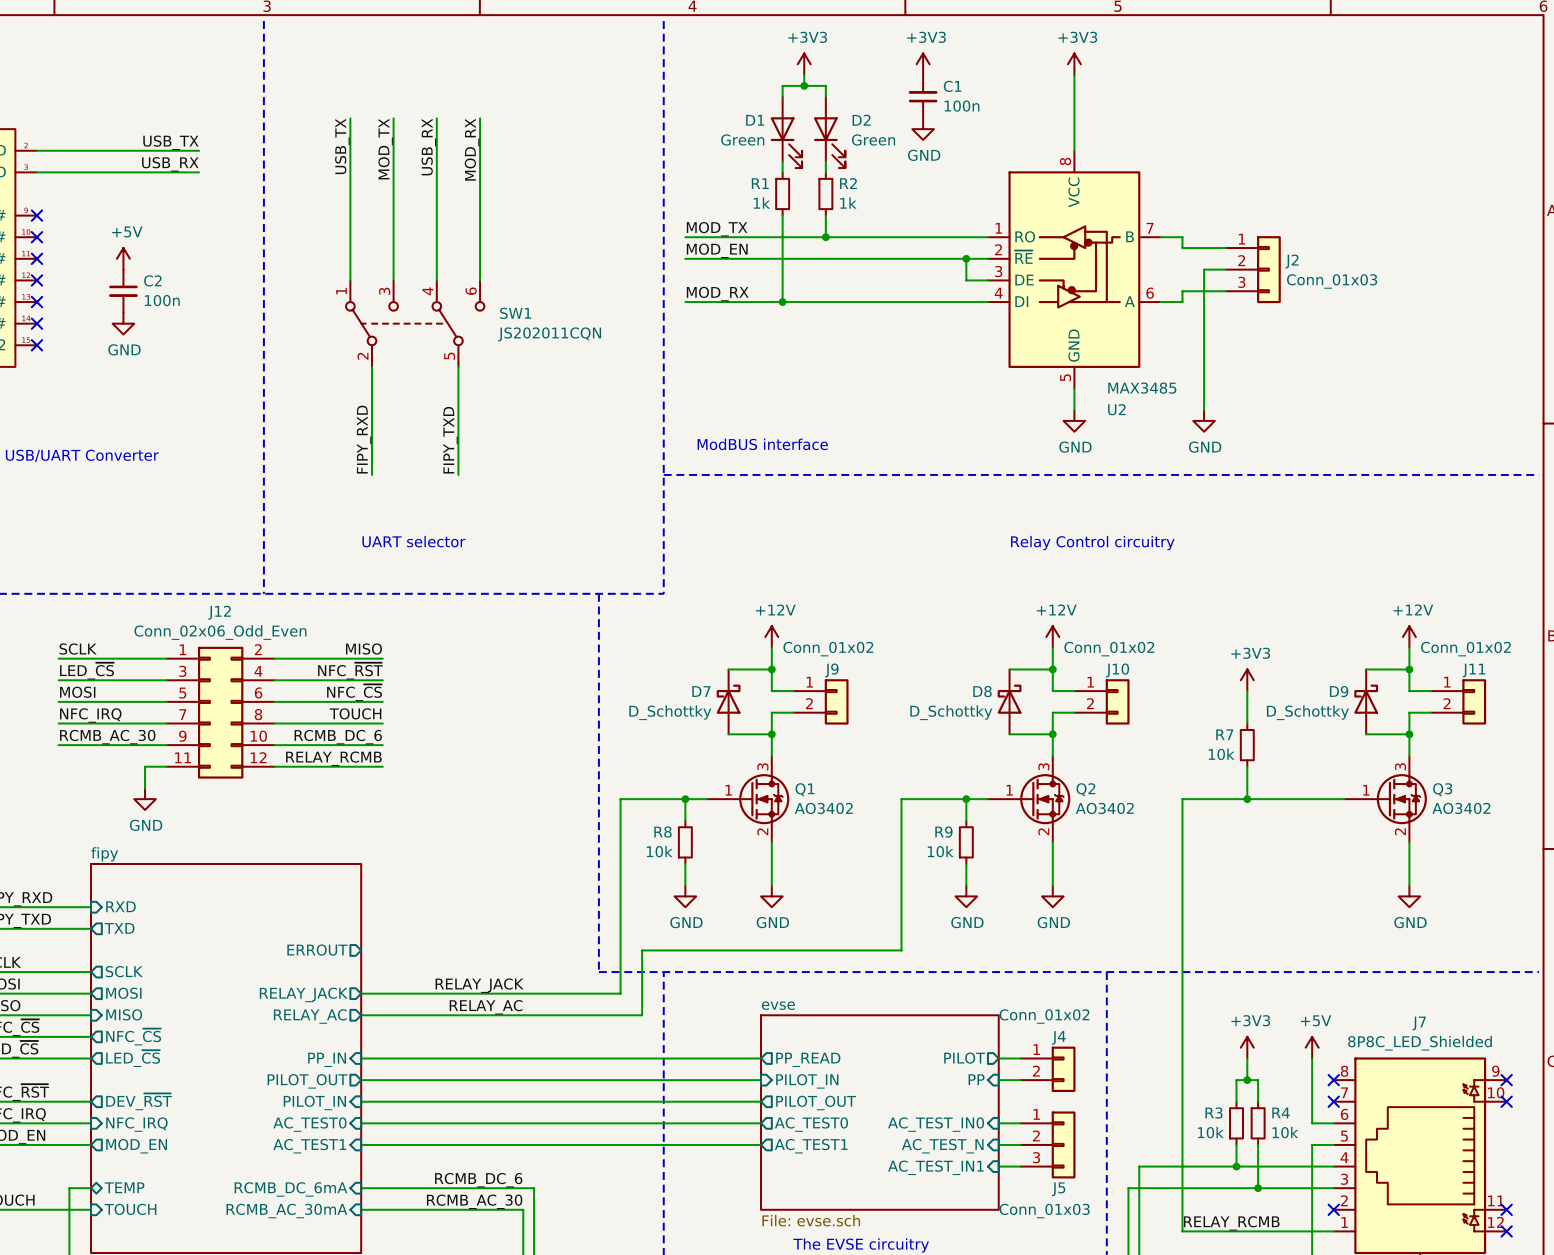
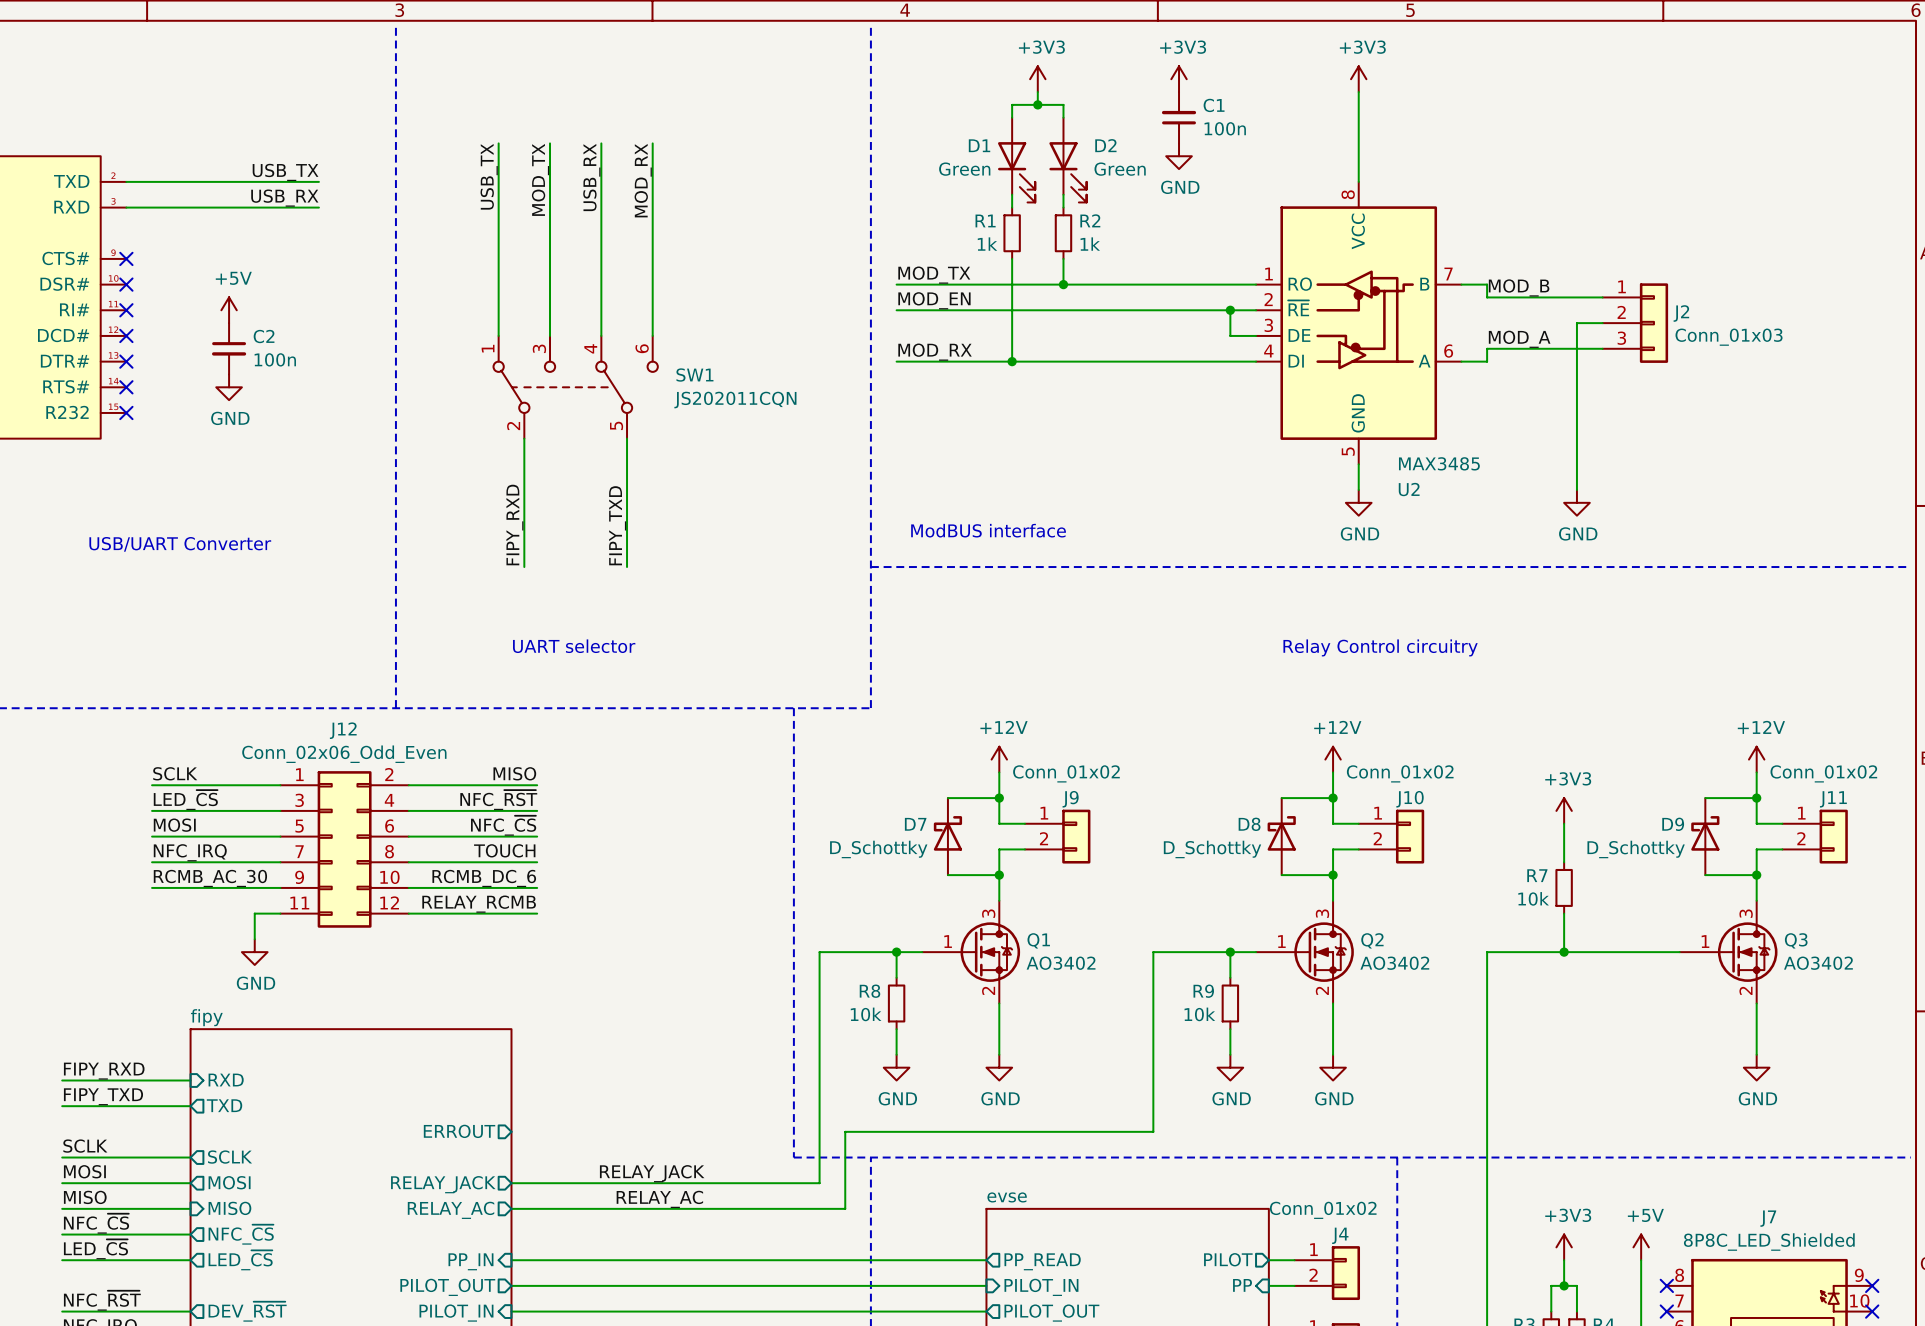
label: none -> MOD_B (1519, 287)
wire: (1225, 269) (1204, 269) (1204, 410) -> (1602, 323) (1576, 323) (1576, 490)
J2 position: (1253, 269) -> (1635, 323)
label: none -> MOD_A (1519, 339)
power symbol position: GND (1204, 420) -> GND (1576, 502)

